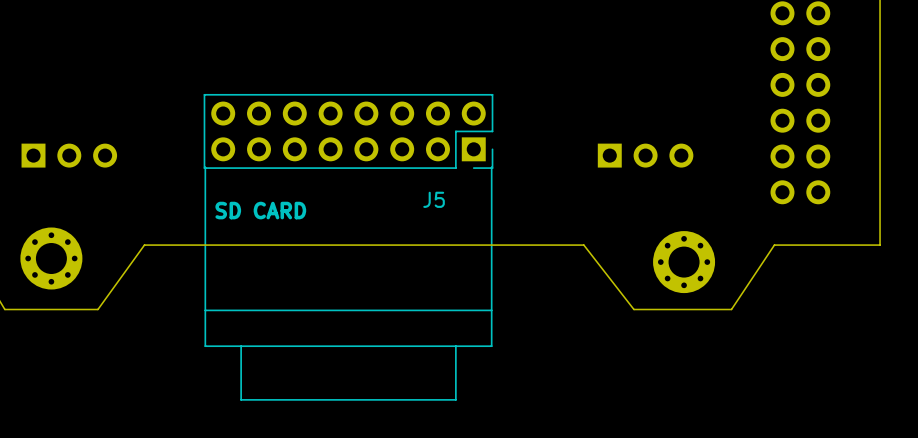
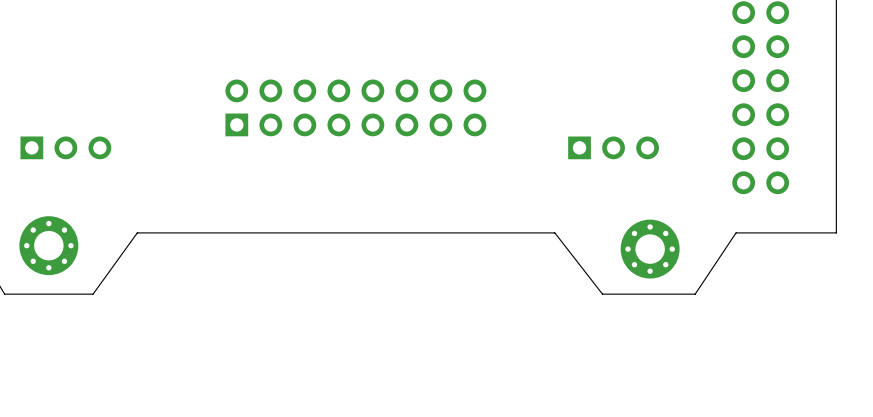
J5 side: bottom (348, 247) -> top (355, 107)

